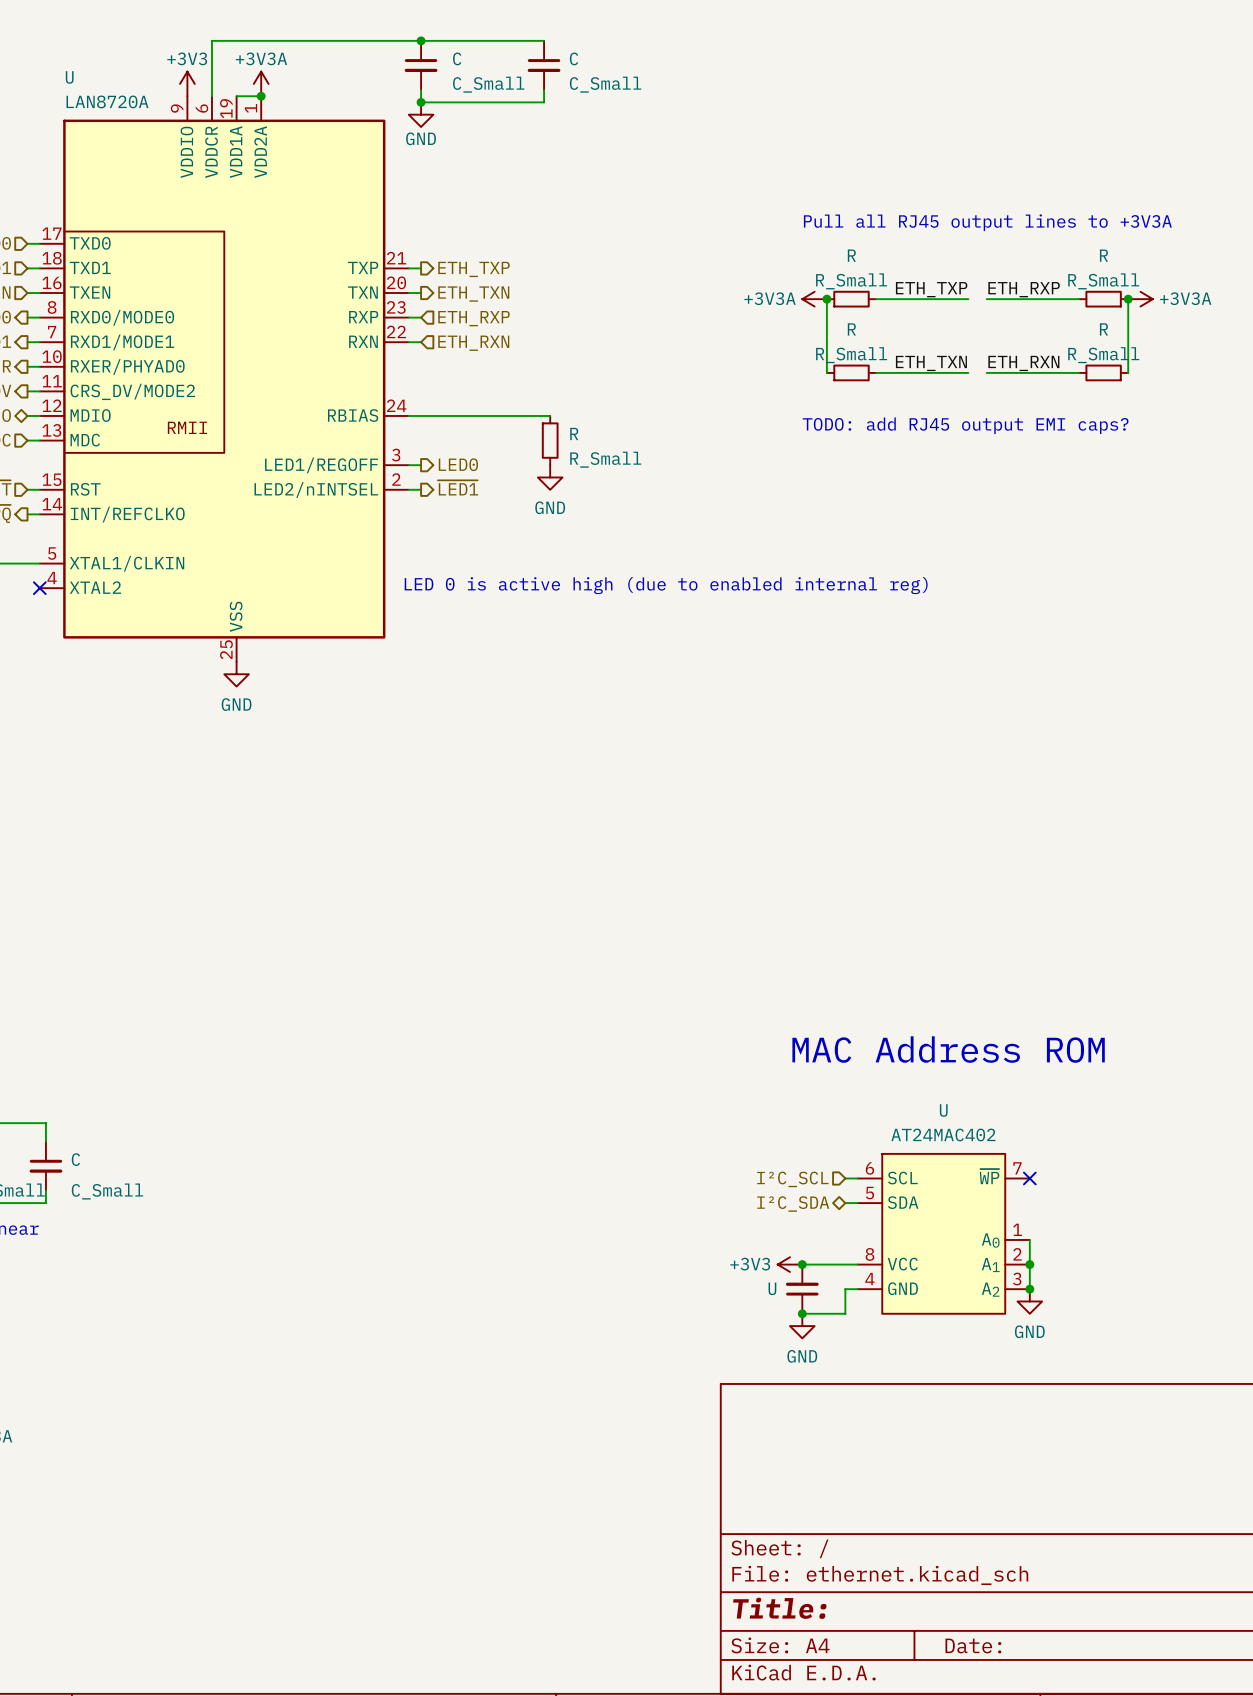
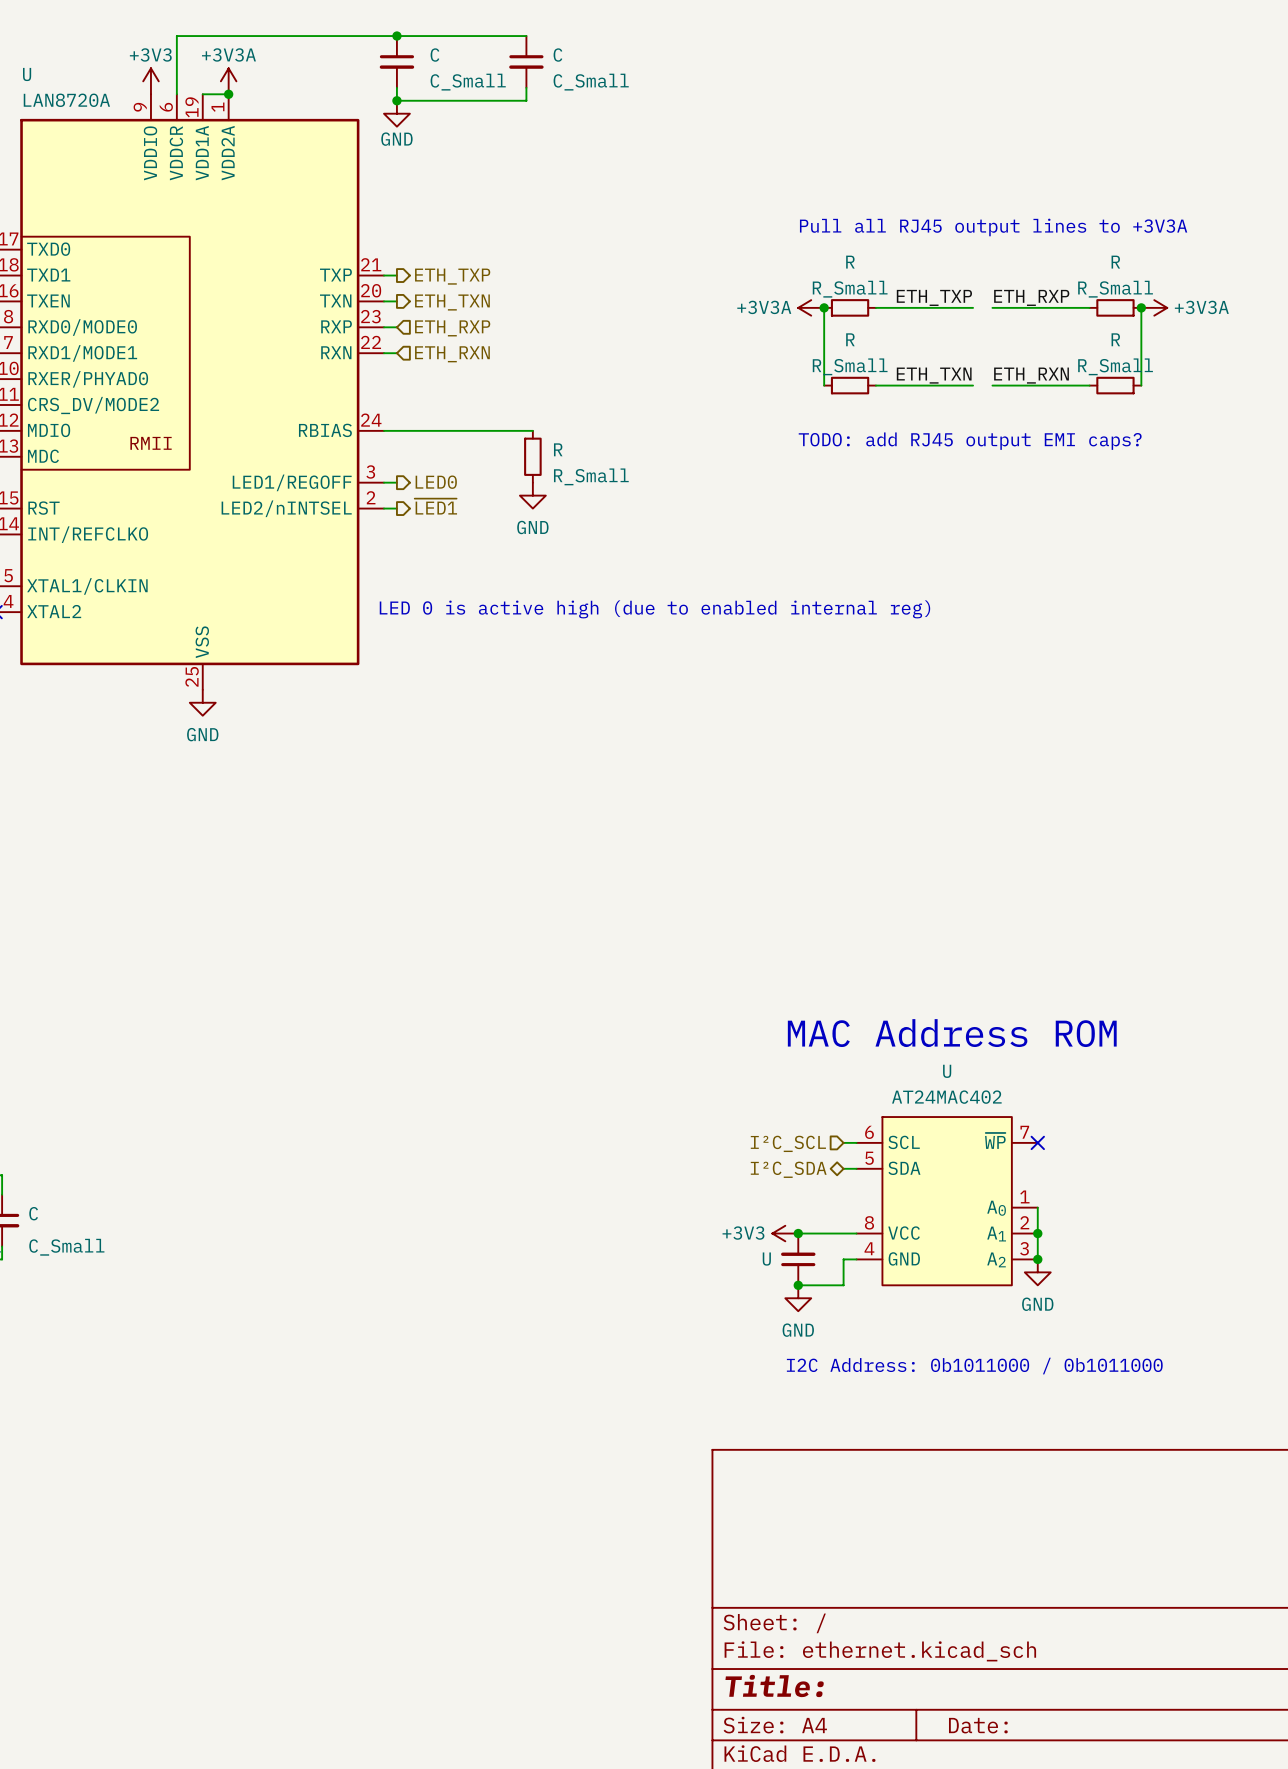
text position: MAC Address ROM (948, 1049) -> MAC Address ROM (952, 1033)
wire: none -> (843, 1142) (856, 1142)
no-connect mark: none -> (1037, 1142)
wire: none -> (843, 1168) (856, 1168)
wire: none -> (798, 1233) (843, 1233)
junction: none -> (798, 1233)
junction: none -> (1037, 1233)
no-connect mark: (1029, 1178) -> none
hierarchical label position: I²C_SCL (792, 1179) -> I²C_SCL (788, 1143)
wire: none -> (843, 1259) (843, 1285) (798, 1285)
junction: none -> (1037, 1259)
hierarchical label position: I²C_SDA (793, 1204) -> I²C_SDA (788, 1169)
U position: (943, 1233) -> (947, 1201)
wire: (1029, 1239) (1029, 1289) -> (1037, 1207) (1037, 1259)
power symbol position: +3V3 (790, 1264) -> +3V3 (785, 1233)
wire: (802, 1264) (857, 1264) -> none
junction position: (802, 1264) -> (798, 1285)
junction: (1029, 1264) -> none
U position: (802, 1289) -> (798, 1259)
wire: (857, 1289) (845, 1289) (845, 1313) (802, 1313) -> none
junction: (1029, 1289) -> none
power symbol position: GND (1029, 1301) -> GND (1037, 1272)
text: none -> I2C Address: 0b1011000 / 0b1011000 (974, 1366)
junction: (802, 1313) -> none
power symbol position: GND (802, 1326) -> GND (798, 1298)

